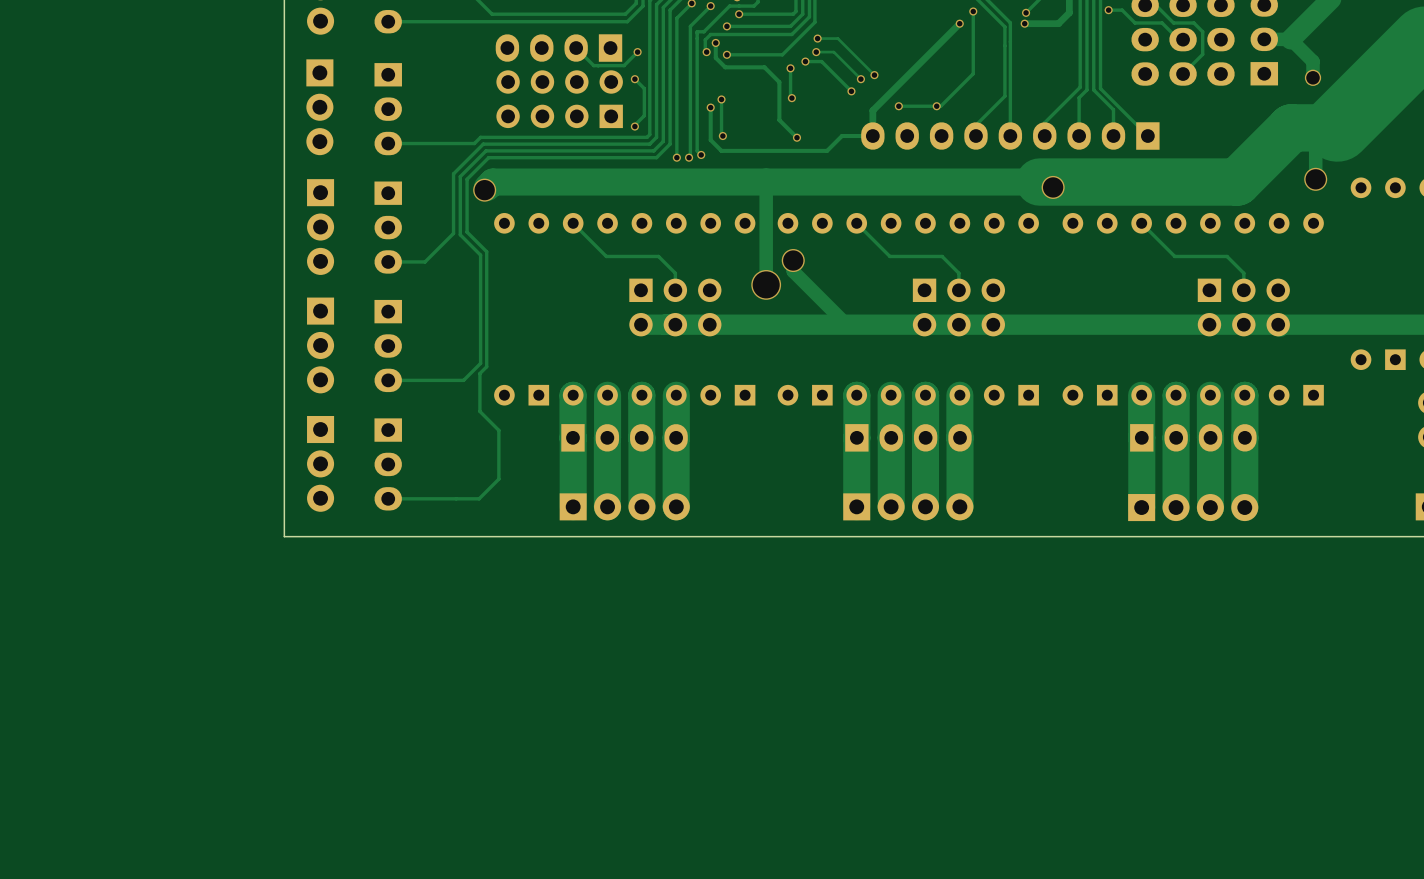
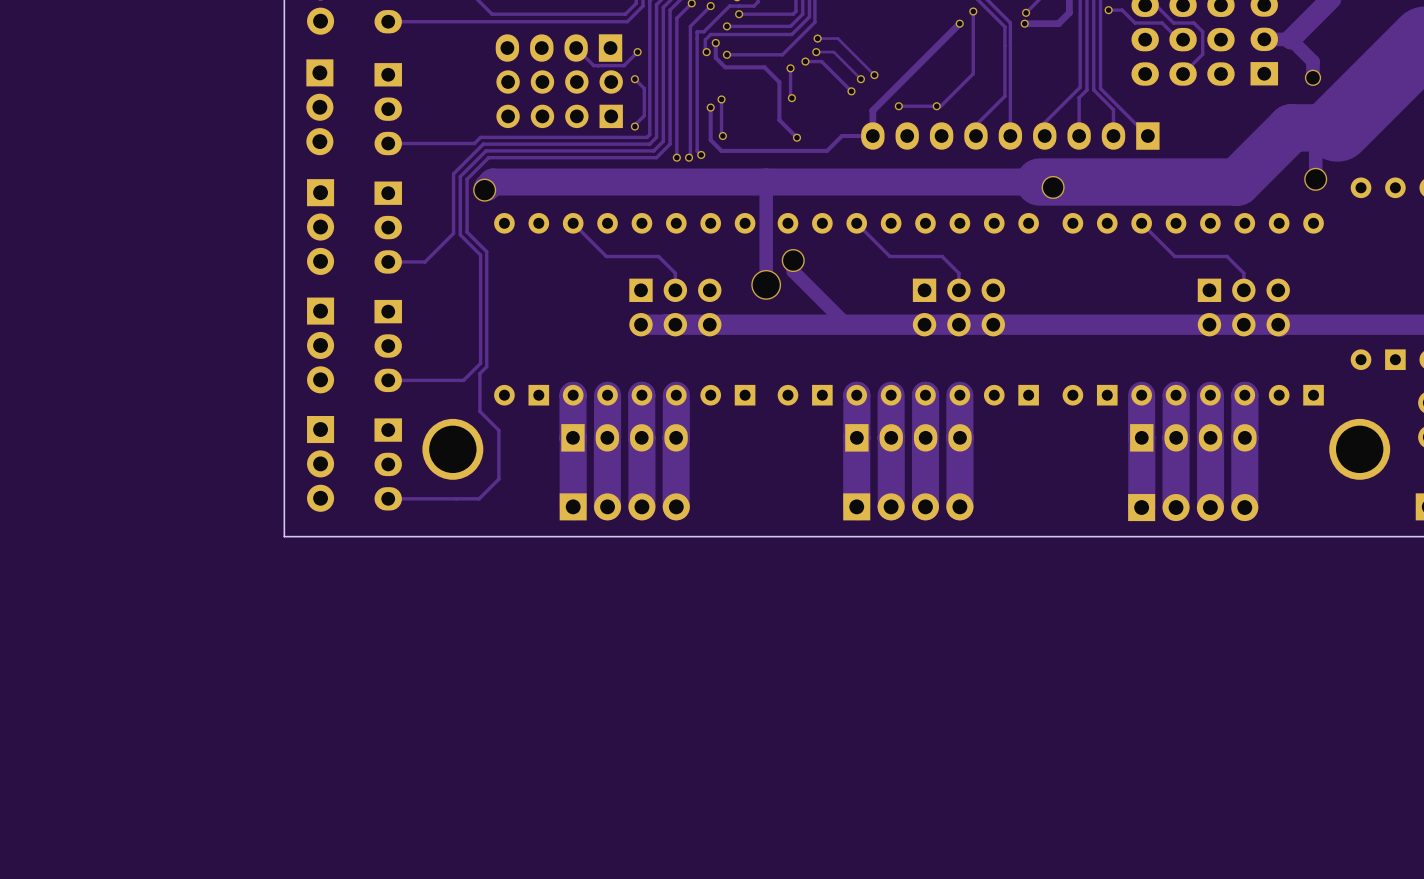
part: none -> (452, 449)
part: none -> (1359, 449)

